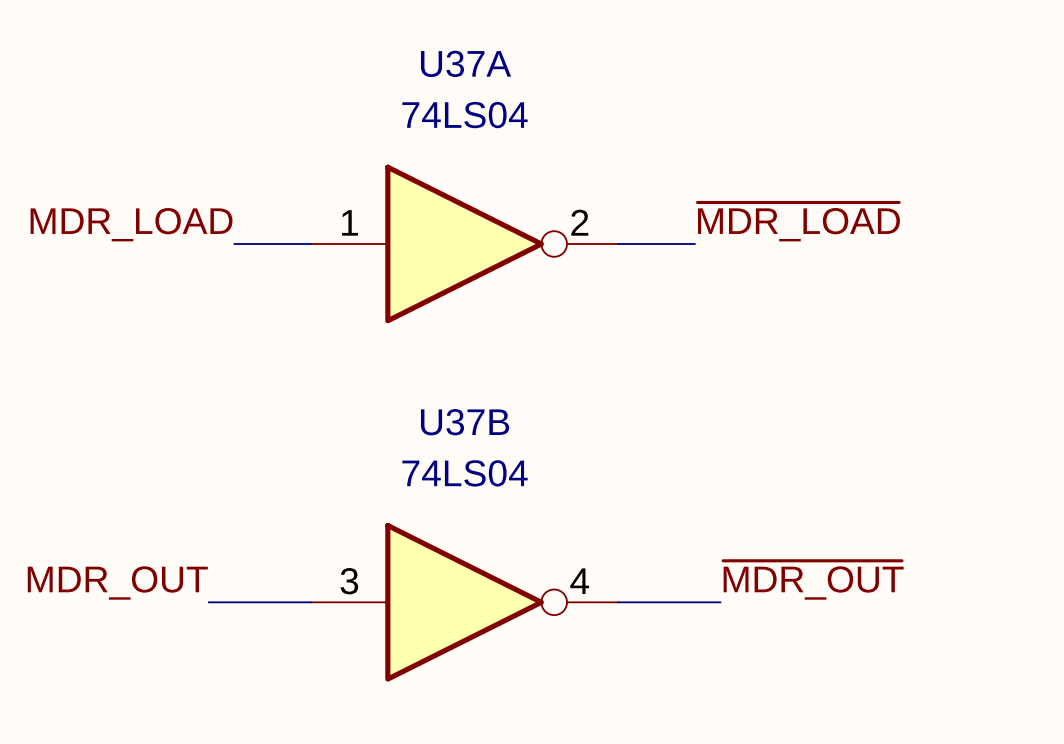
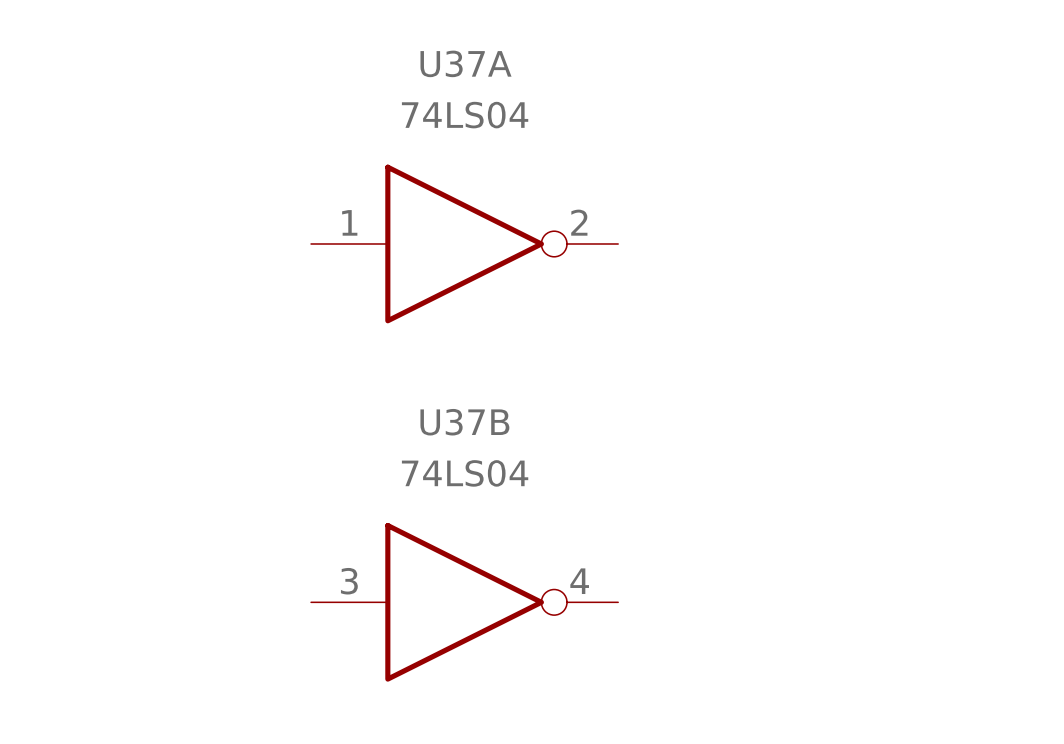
label: ~{MDR_LOAD} (798, 221) -> none
label: MDR_LOAD (131, 224) -> none
wire: (234, 243) (311, 243) -> none
wire: (618, 243) (694, 243) -> none
label: ~{MDR_OUT} (813, 580) -> none
label: MDR_OUT (117, 582) -> none
wire: (208, 602) (311, 602) -> none
wire: (618, 602) (720, 602) -> none

